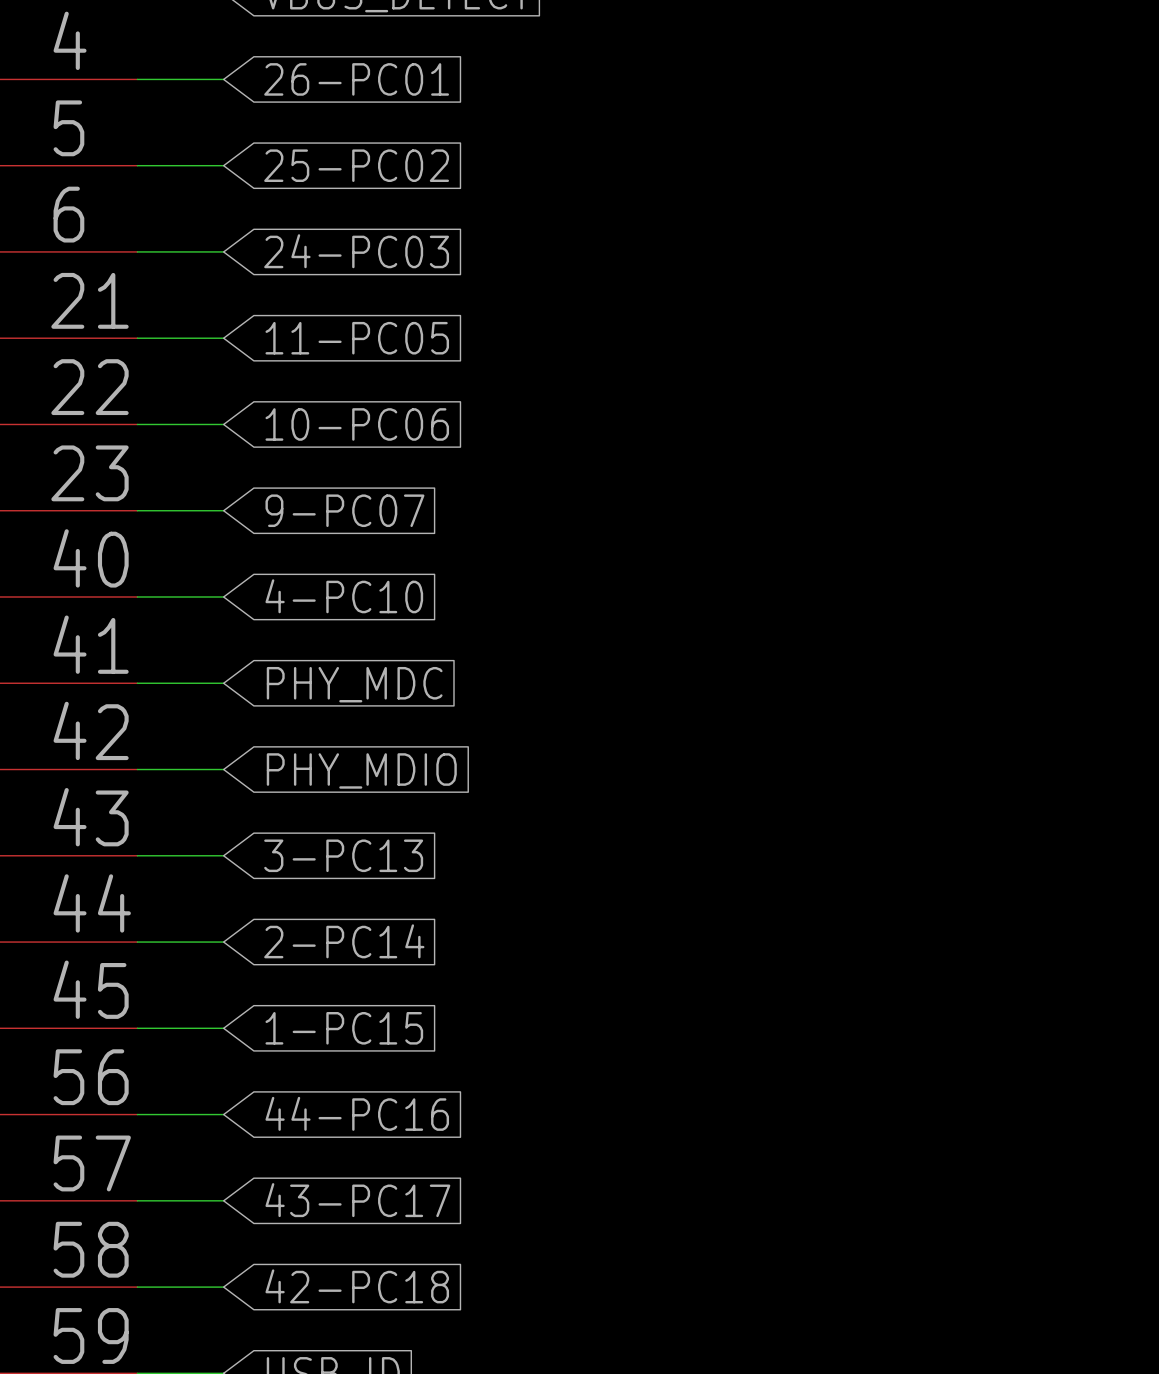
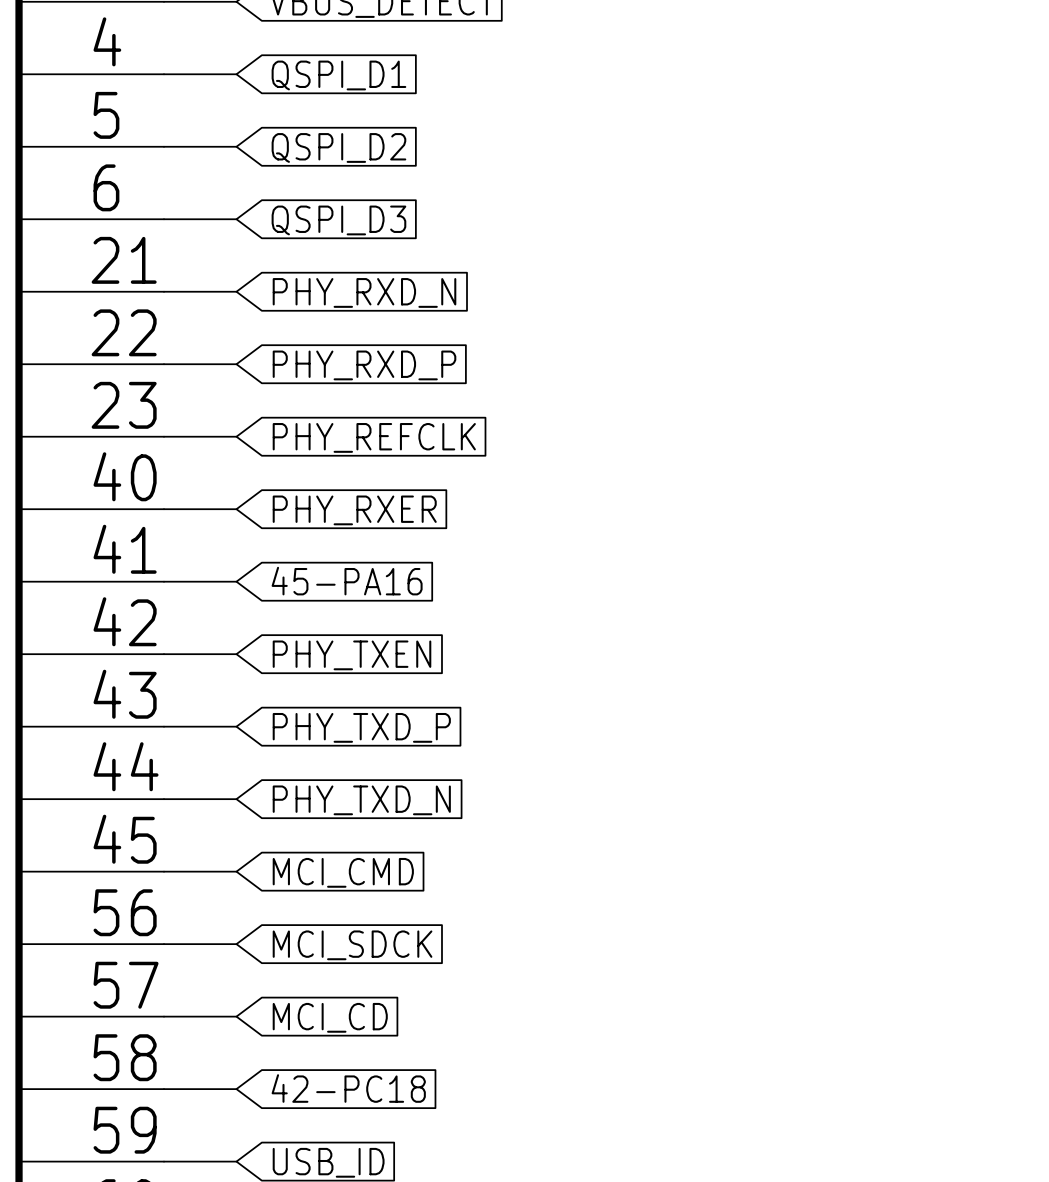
global label: 26-PC01 (356, 79) -> QSPI_D1 (338, 75)
global label: 25-PC02 (356, 165) -> QSPI_D2 (338, 147)
global label: 24-PC03 (356, 251) -> QSPI_D3 (338, 220)
global label: 11-PC05 (357, 338) -> PHY_RXD_N (364, 292)
global label: 10-PC06 (357, 424) -> PHY_RXD_P (364, 365)
global label: 9-PC07 (344, 510) -> PHY_REFCLK (374, 437)
global label: 4-PC10 (344, 596) -> PHY_RXER (354, 510)
global label: PHY_MDC (354, 684) -> 45-PA16 (347, 581)
global label: PHY_MDIO (361, 770) -> PHY_TXEN (351, 655)
global label: 3-PC13 (343, 855) -> PHY_TXD_P (361, 727)
global label: 2-PC14 (344, 941) -> PHY_TXD_N (361, 800)
global label: 1-PC15 (344, 1028) -> MCI_CMD (343, 872)
global label: 44-PC16 (357, 1113) -> MCI_SDCK (352, 945)
global label: 43-PC17 (357, 1200) -> MCI_CD (330, 1017)

